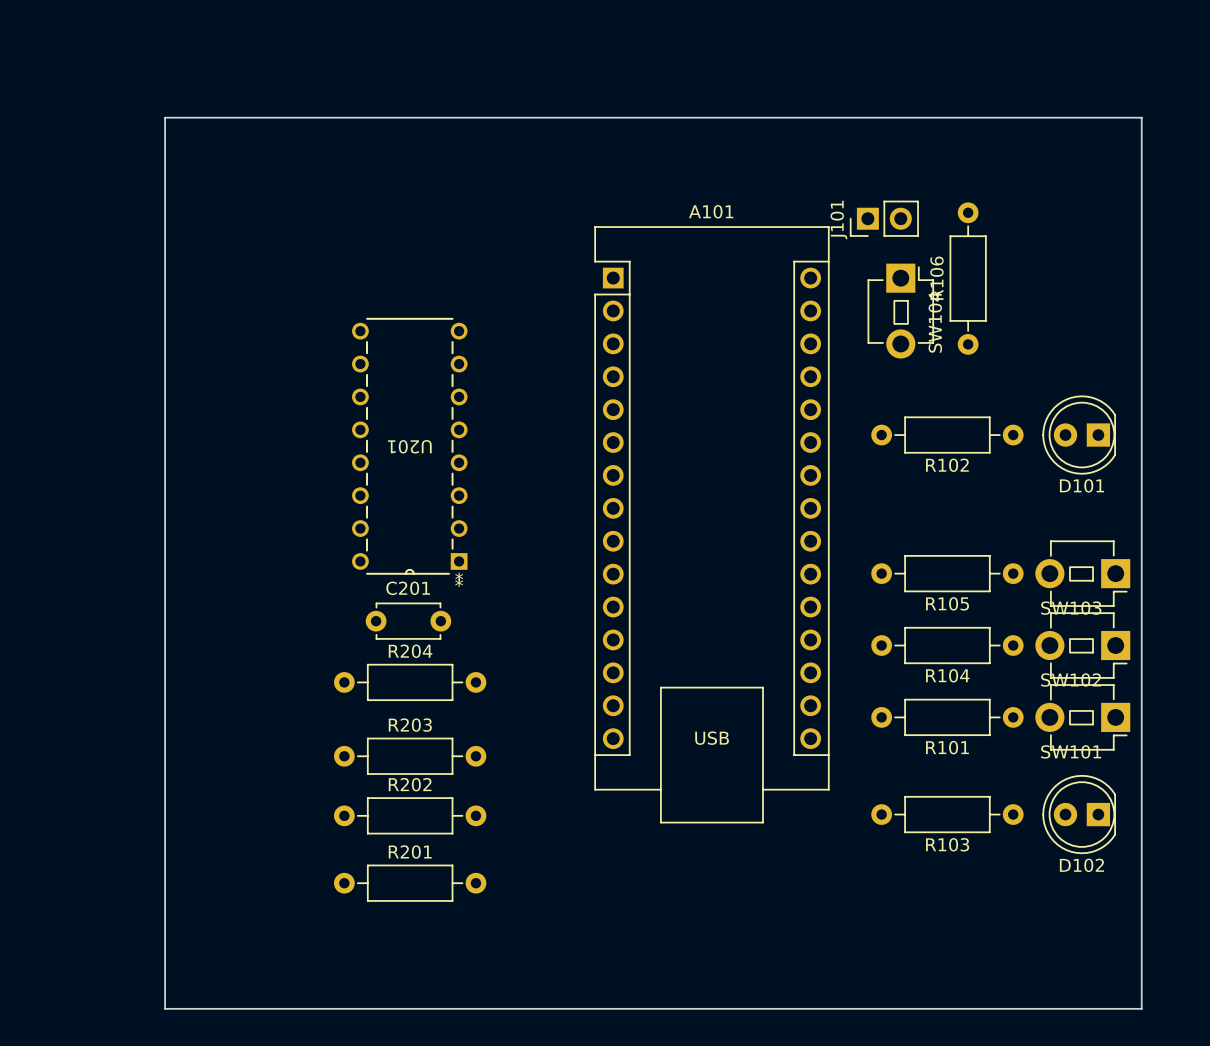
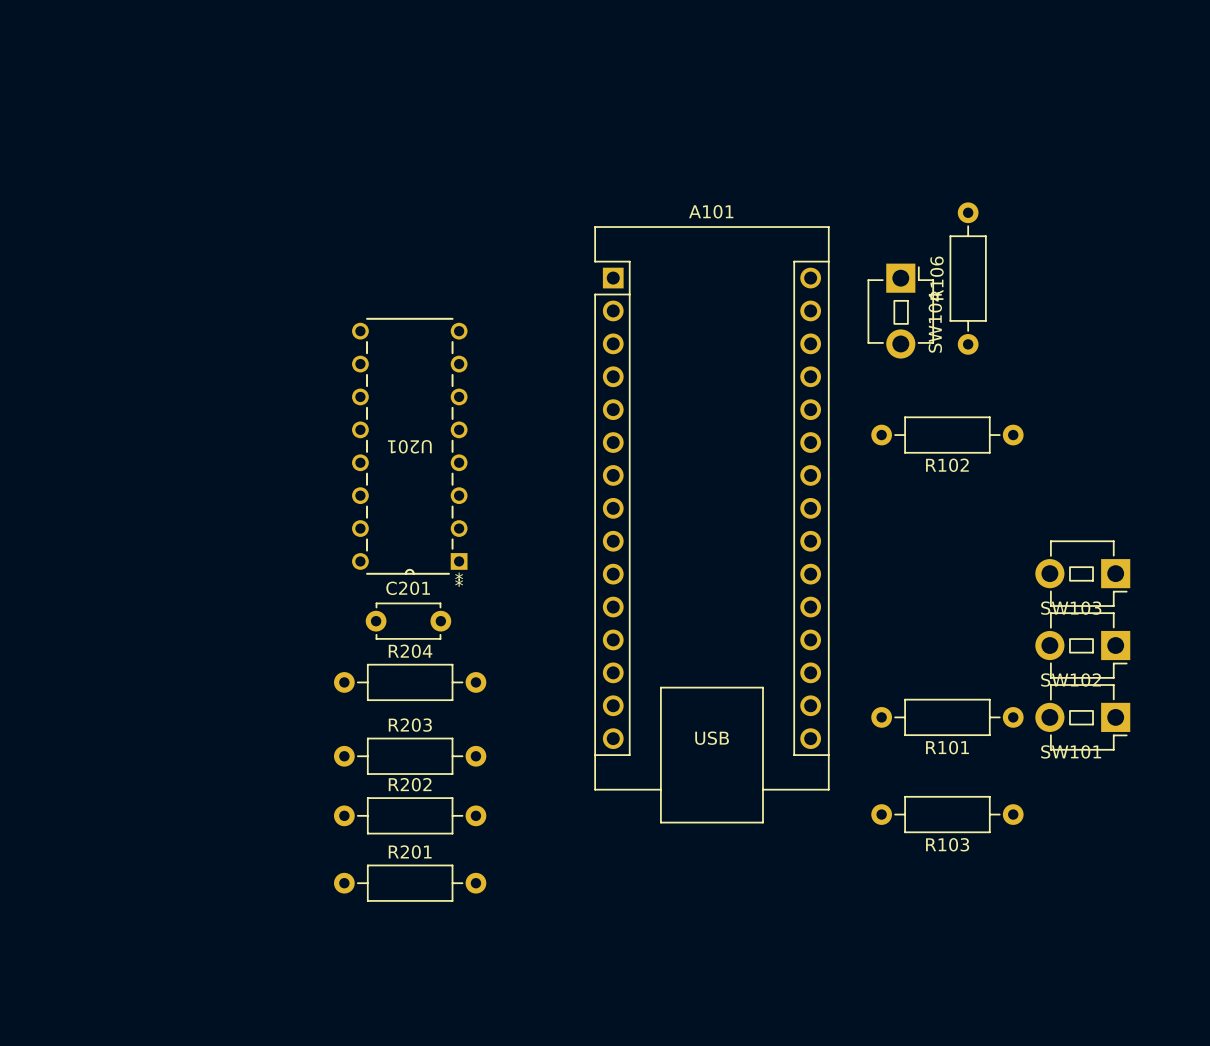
board edge: (165, 117) (165, 1008) (1141, 1008) (1141, 117) (165, 117) -> none
J101: (884, 218) -> none
D101: (1079, 435) -> none
R105: (947, 573) -> none
R104: (947, 645) -> none
D102: (1079, 814) -> none

